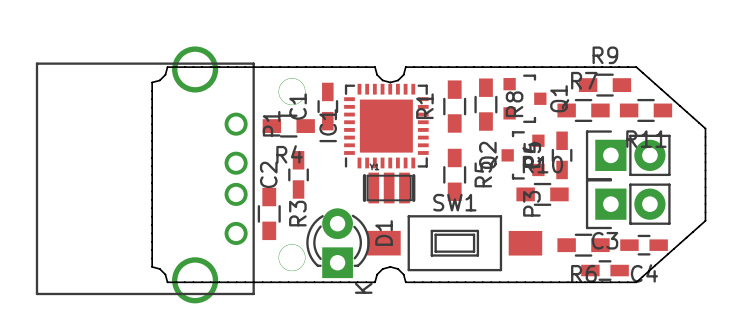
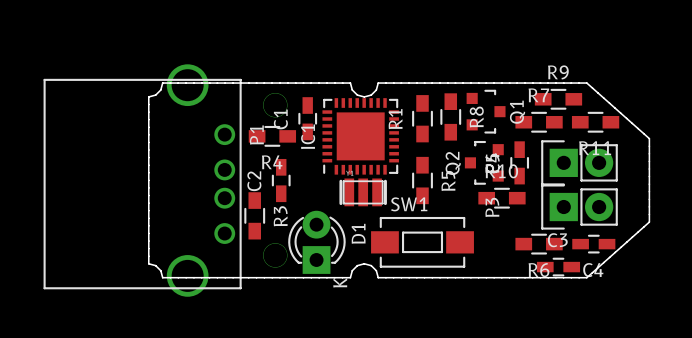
SW1 footprint: [367, 215, 543, 272] -> [371, 216, 474, 268]

